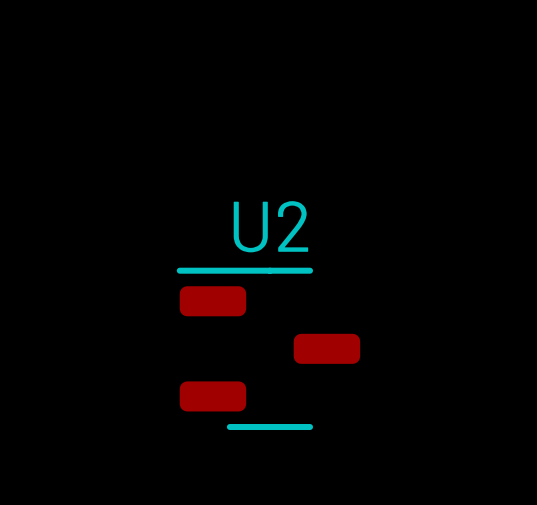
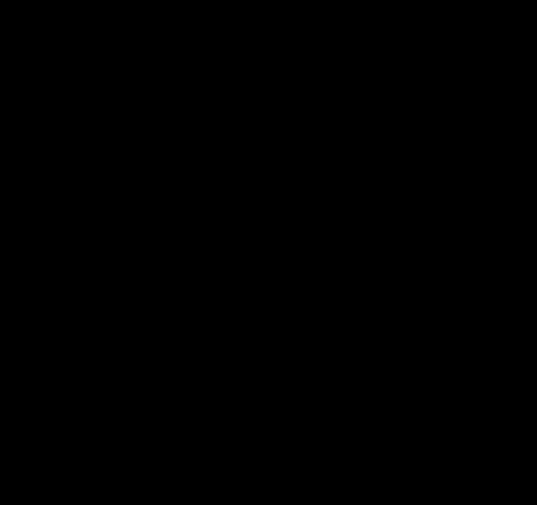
U2: (268, 348) -> none

